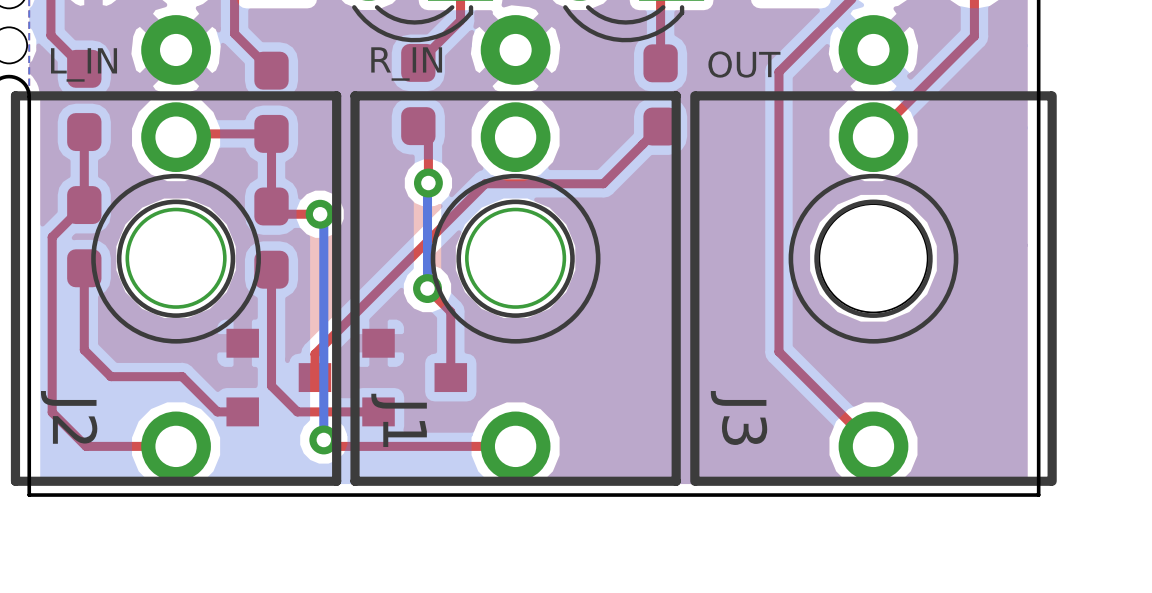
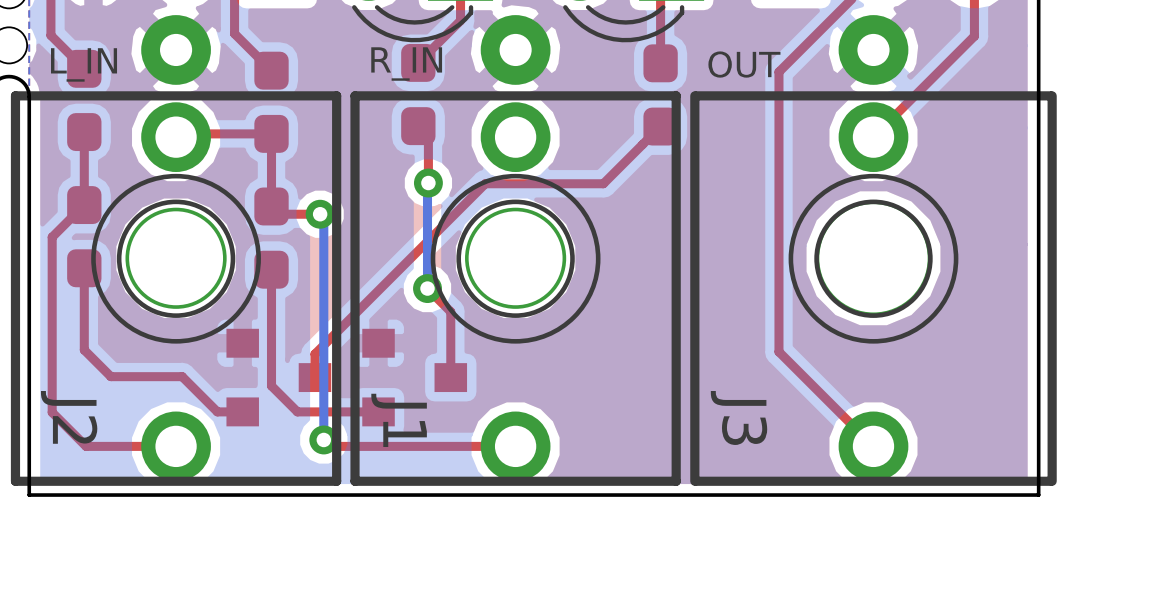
J3 footprint: [690, 15, 1057, 486] -> [690, 15, 1057, 486]

